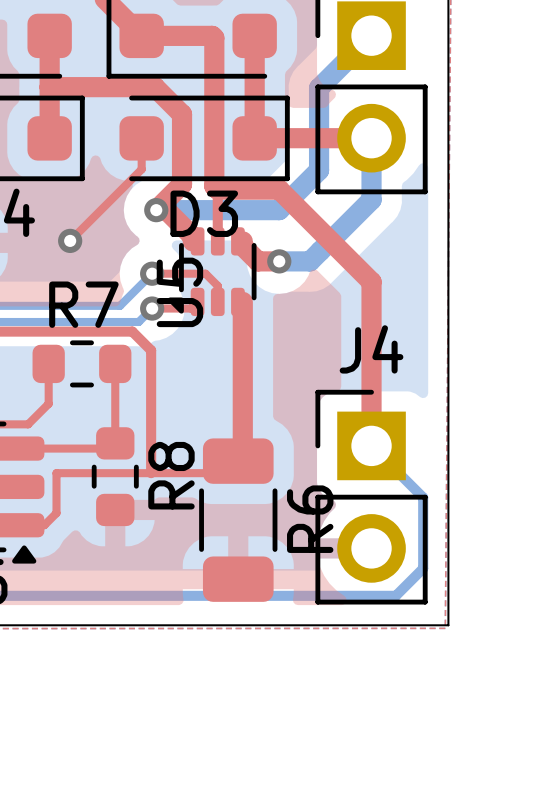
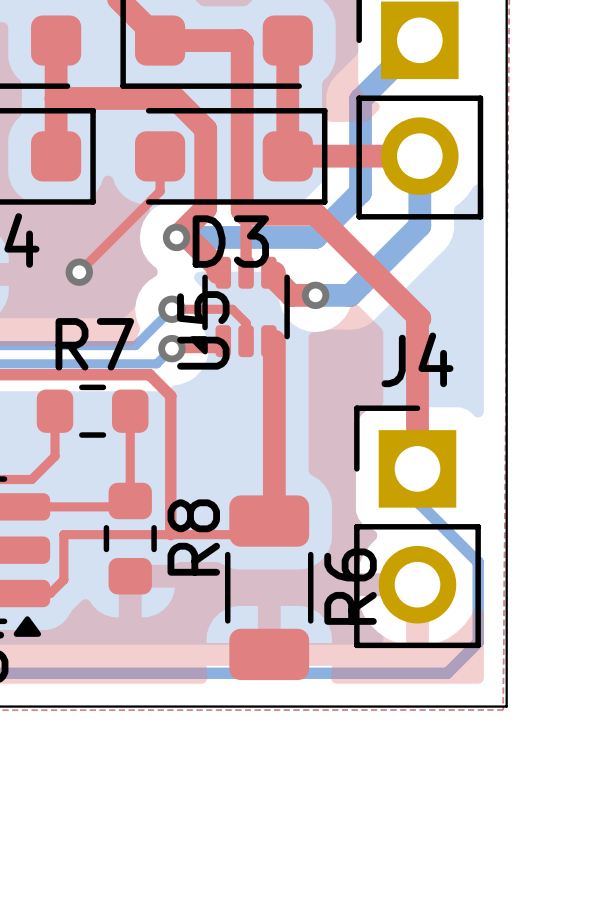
top track: (371, 281) (371, 445) -> (419, 318) (417, 320) (417, 468)
J4 position: (371, 497) -> (417, 526)

